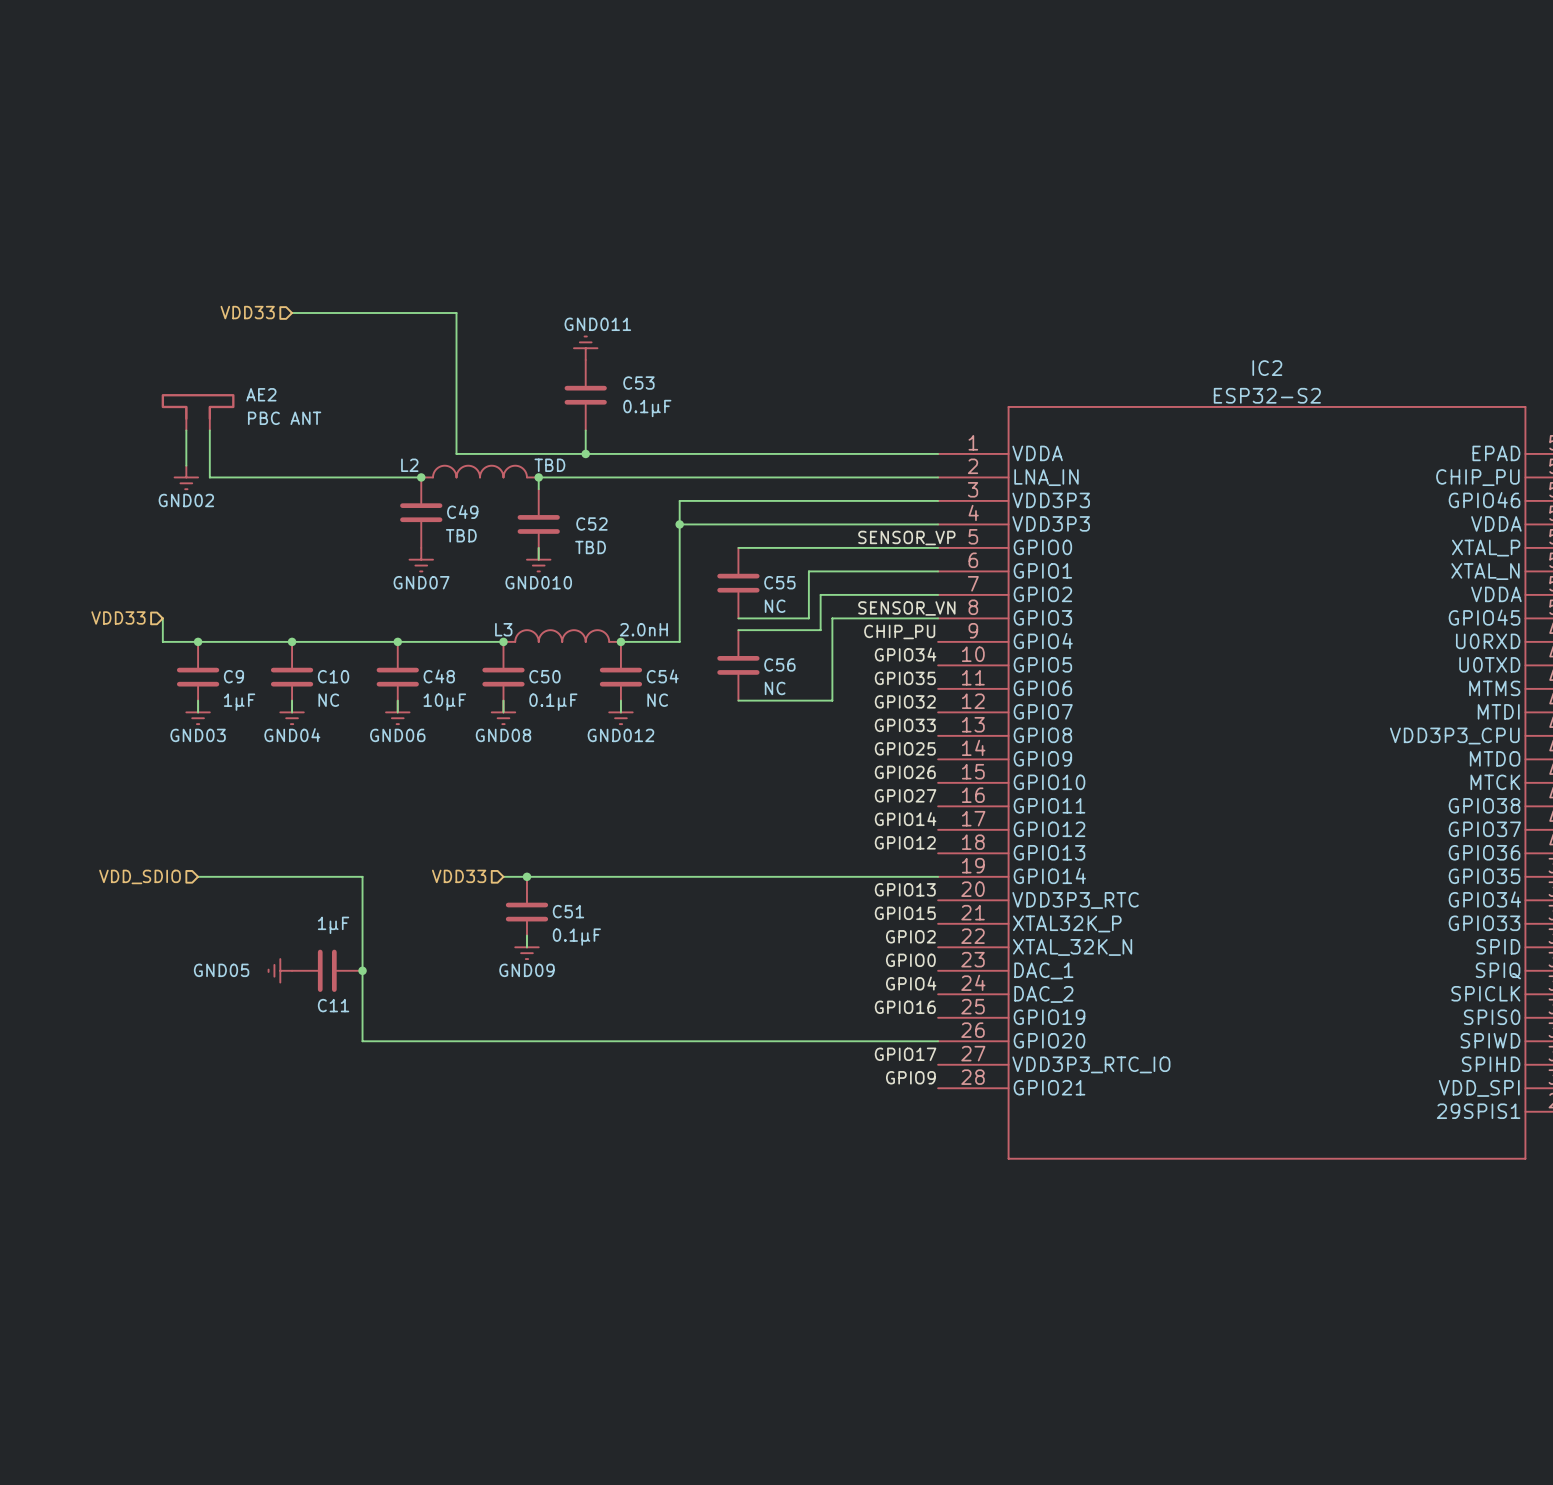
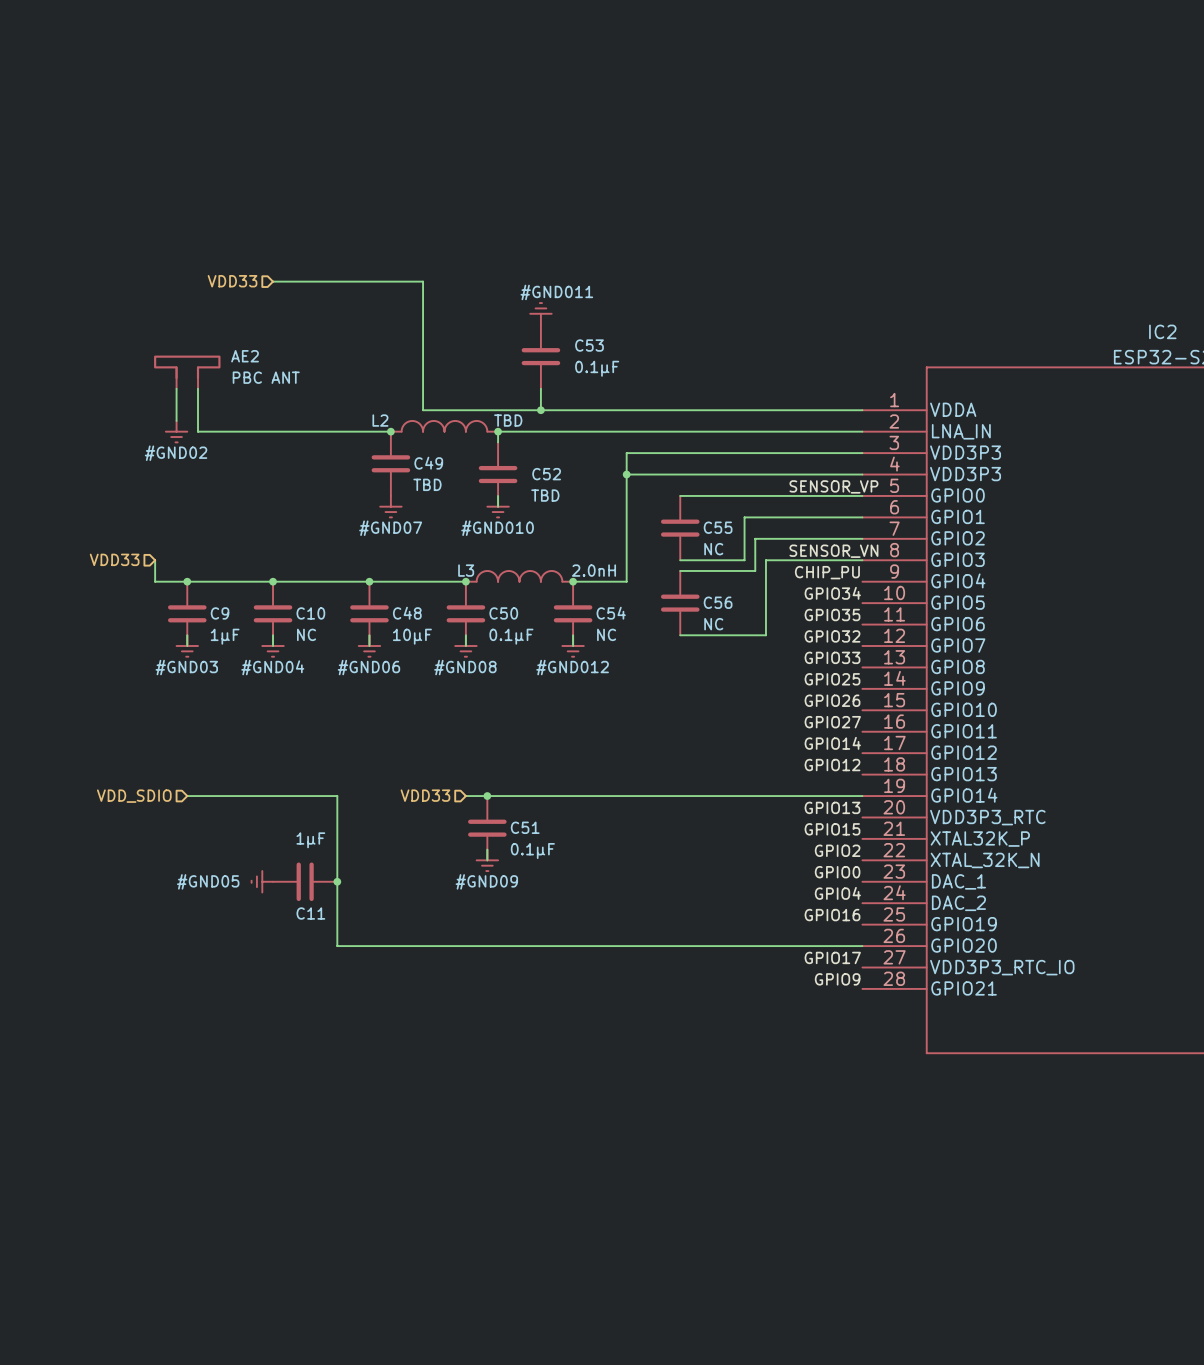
GND011 name: GND011 (597, 324) -> #GND011 (556, 292)
GND02 name: GND02 (186, 500) -> #GND02 (176, 453)
GND07 name: GND07 (421, 582) -> #GND07 (390, 528)
GND010 name: GND010 (538, 582) -> #GND010 (497, 528)
GND03 name: GND03 (198, 735) -> #GND03 (186, 667)
GND04 name: GND04 (292, 735) -> #GND04 (272, 667)
GND06 name: GND06 (397, 735) -> #GND06 (368, 667)
GND08 name: GND08 (503, 735) -> #GND08 (465, 667)
GND012 name: GND012 (620, 735) -> #GND012 (572, 667)
GND05 name: GND05 (221, 970) -> #GND05 (208, 881)
GND09 name: GND09 (526, 970) -> #GND09 (486, 881)

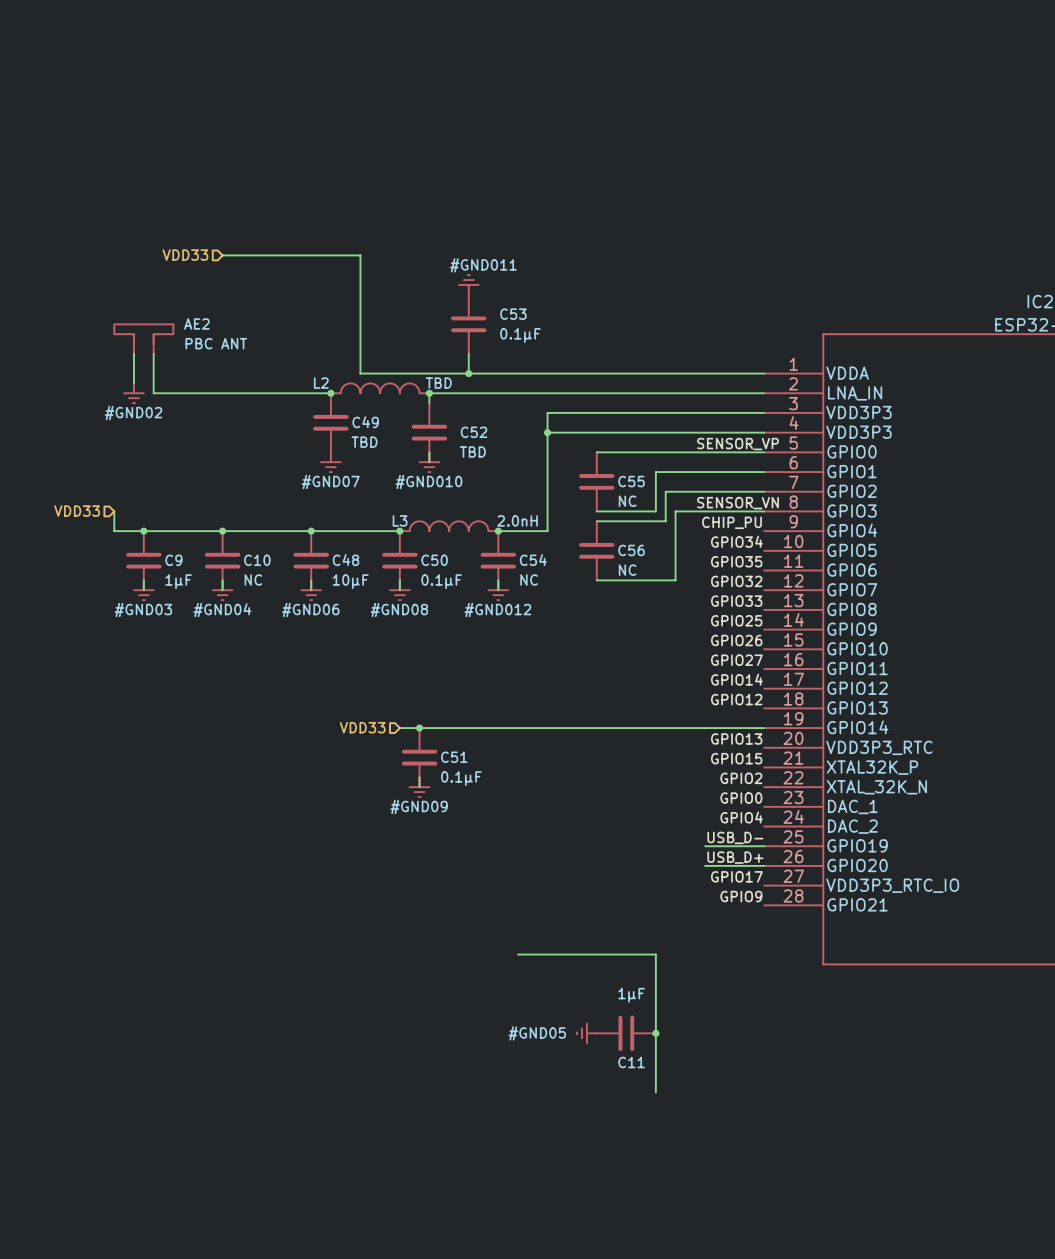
hierarchical label: VDD_SDIO (134, 796) -> none
wire: (187, 796) (337, 796) (337, 946) (798, 946) -> none
#GND05 position: (262, 881) -> (586, 1033)
C11 position: (305, 881) -> (626, 1033)
junction: (337, 881) -> none
label: none -> USB_D- (735, 837)
label: GPIO16 (832, 915) -> none
wire: none -> (705, 846) (764, 846)
label: none -> USB_D+ (735, 857)
wire: none -> (518, 954) (655, 954) (655, 1092)
junction: none -> (655, 1033)

